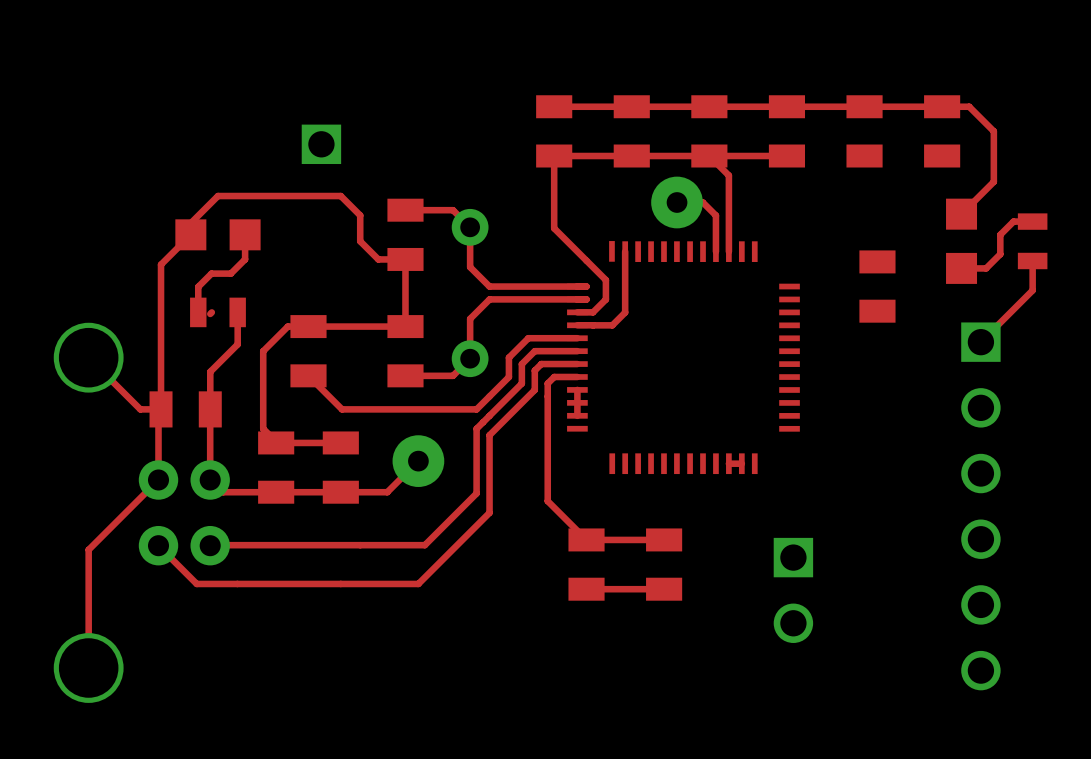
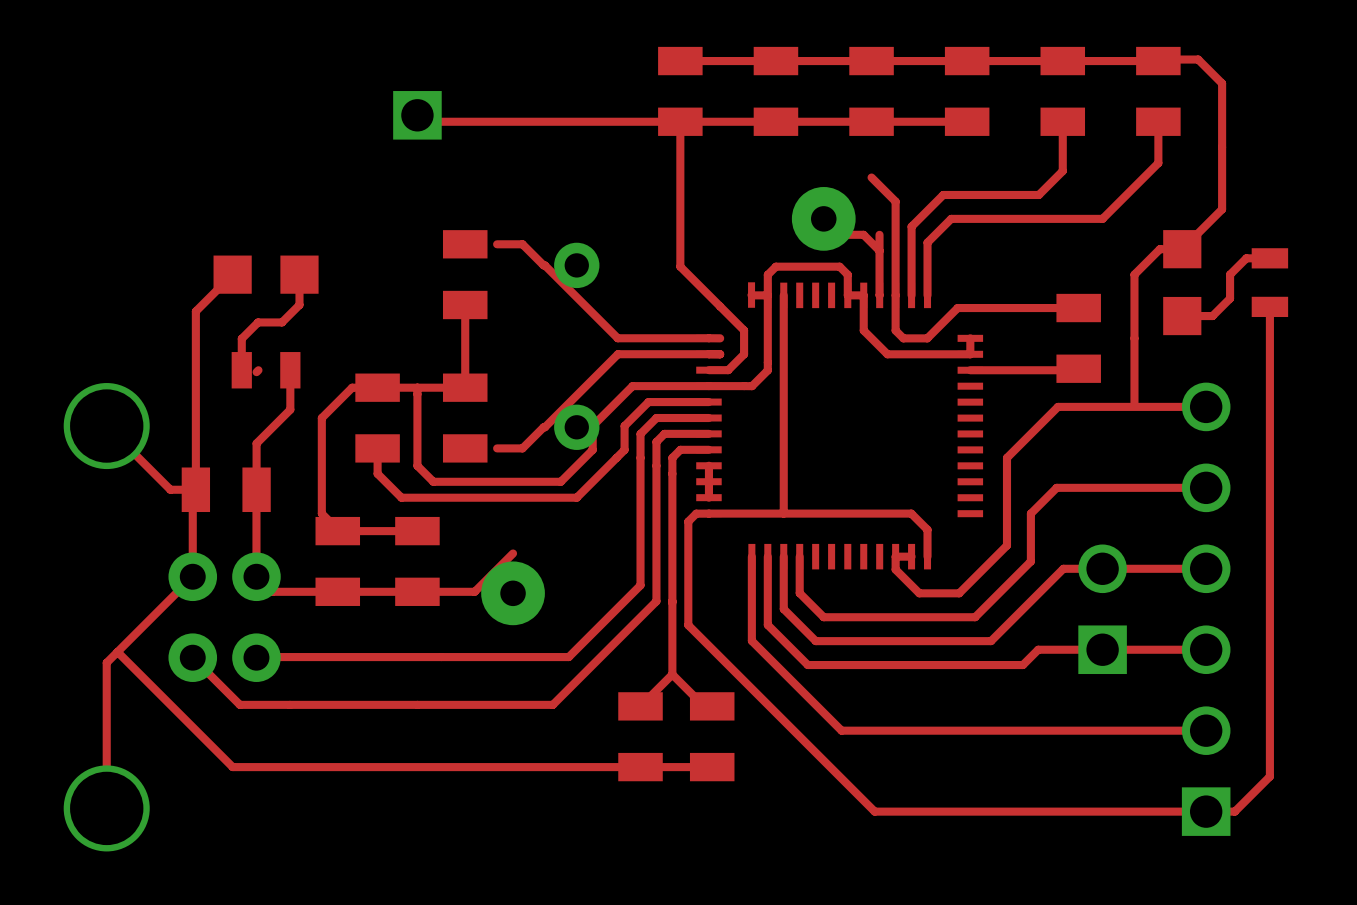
part: none -> (680, 91)
part: none -> (775, 91)
part: none -> (871, 91)
part: none -> (967, 91)
part: none -> (1062, 91)
part: none -> (1158, 91)
track: none -> (417, 115) (423, 121) (967, 121)
track: (554, 106) (969, 106) (993, 131) -> (680, 61) (1198, 59) (1222, 83) (1222, 147)
track: none -> (1062, 121) (1062, 171) (1038, 194) (943, 194) (911, 226) (911, 295)
track: none -> (1158, 121) (1158, 163) (1102, 218) (951, 218) (927, 242) (927, 295)
part: (554, 131) -> none
part: (631, 131) -> none
part: (709, 131) -> none
part: (786, 131) -> none
part: (864, 131) -> none
part: (942, 131) -> none
part position: (321, 144) -> (417, 115)
track: (554, 156) (786, 156) -> (680, 177) (680, 121)
via position: (677, 202) -> (823, 218)
track: (426, 210) (453, 210) (470, 227) (470, 267) (489, 286) (503, 286) -> (522, 244) (617, 338)
track: none -> (1182, 249) (1159, 249) (1134, 274) (1134, 402)
track: (190, 234) (190, 223) (217, 196) (340, 196) (360, 215) (360, 241) (378, 259) (405, 259) (405, 326) (379, 326) -> (465, 305) (465, 387)
part position: (405, 234) -> (465, 274)
track: none -> (751, 295) (767, 295) (767, 274) (775, 266) (839, 266) (847, 274) (847, 295) (863, 295) (863, 330) (887, 354) (970, 354) (970, 338)
track: none -> (783, 295) (783, 513)
track: none -> (895, 295) (895, 330) (903, 338) (927, 338) (957, 308) (1078, 308)
track: (1032, 290) (980, 342) -> (1269, 343) (1269, 776) (1234, 811) (874, 811) (688, 625) (688, 521) (696, 513) (911, 513) (927, 529) (927, 556)
track: (503, 299) (489, 299) (470, 318) (470, 358) (453, 375) (426, 375) -> (617, 354) (522, 448)
track: none -> (1078, 368) (970, 370)
track: none -> (708, 386) (632, 386) (592, 426) (592, 449) (560, 481) (433, 481) (417, 465) (417, 387)
track: none -> (1206, 406) (1057, 406) (1007, 457) (1007, 545) (959, 593) (919, 593) (895, 569) (895, 556)
part position: (405, 351) -> (465, 418)
track: (308, 375) (342, 409) (476, 409) -> (377, 448) (377, 473) (401, 497) (576, 497) (584, 489)
track: (521, 383) (476, 428) (476, 493) (424, 545) -> (640, 457) (640, 585) (568, 657) (521, 657)
track: (534, 390) (489, 435) (489, 512) (418, 583) -> (656, 465) (656, 601) (552, 704) (513, 704)
track: none -> (1206, 487) (1056, 487) (1030, 513) (1030, 561) (975, 617) (823, 617) (799, 593) (799, 556)
via position: (418, 461) -> (513, 593)
track: none -> (751, 556) (751, 640) (841, 730) (1206, 730)
track: none -> (767, 556) (767, 625) (807, 665) (1022, 665) (1038, 649) (1206, 649)
track: none -> (783, 556) (783, 609) (815, 641) (991, 641) (1063, 568) (1206, 568)
track: (547, 501) (586, 539) (664, 539) -> (672, 602) (672, 674)
part rotation: 0° (980, 506) -> 180° (1206, 609)
track: none -> (117, 651) (232, 767) (712, 767)
track: none -> (672, 674) (704, 706) (712, 706)
track: none -> (672, 674) (640, 706)
part: (586, 564) -> none
part: (664, 564) -> none
track: (586, 589) (664, 589) -> none
part rotation: 0° (793, 590) -> 180° (1102, 609)
part position: (793, 590) -> (1102, 609)
part: none -> (640, 736)
part: none -> (712, 736)

